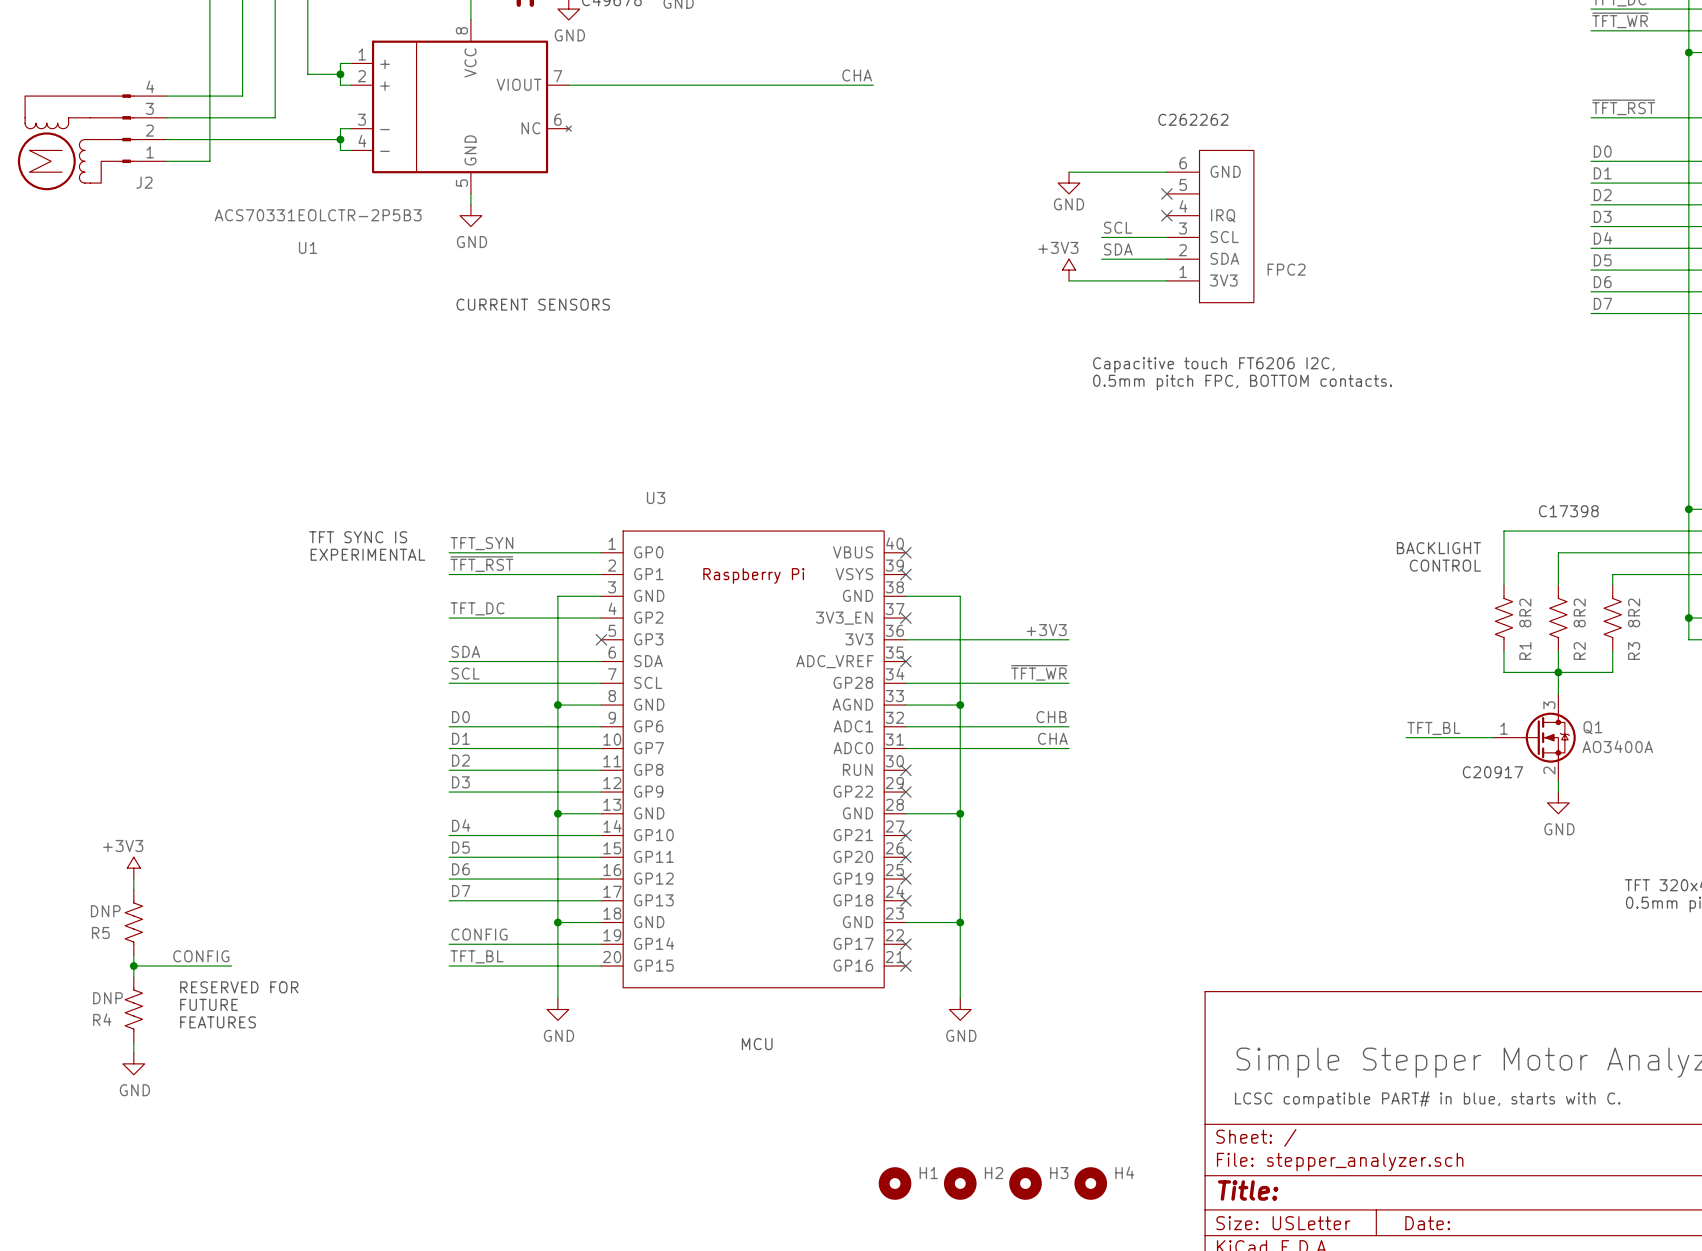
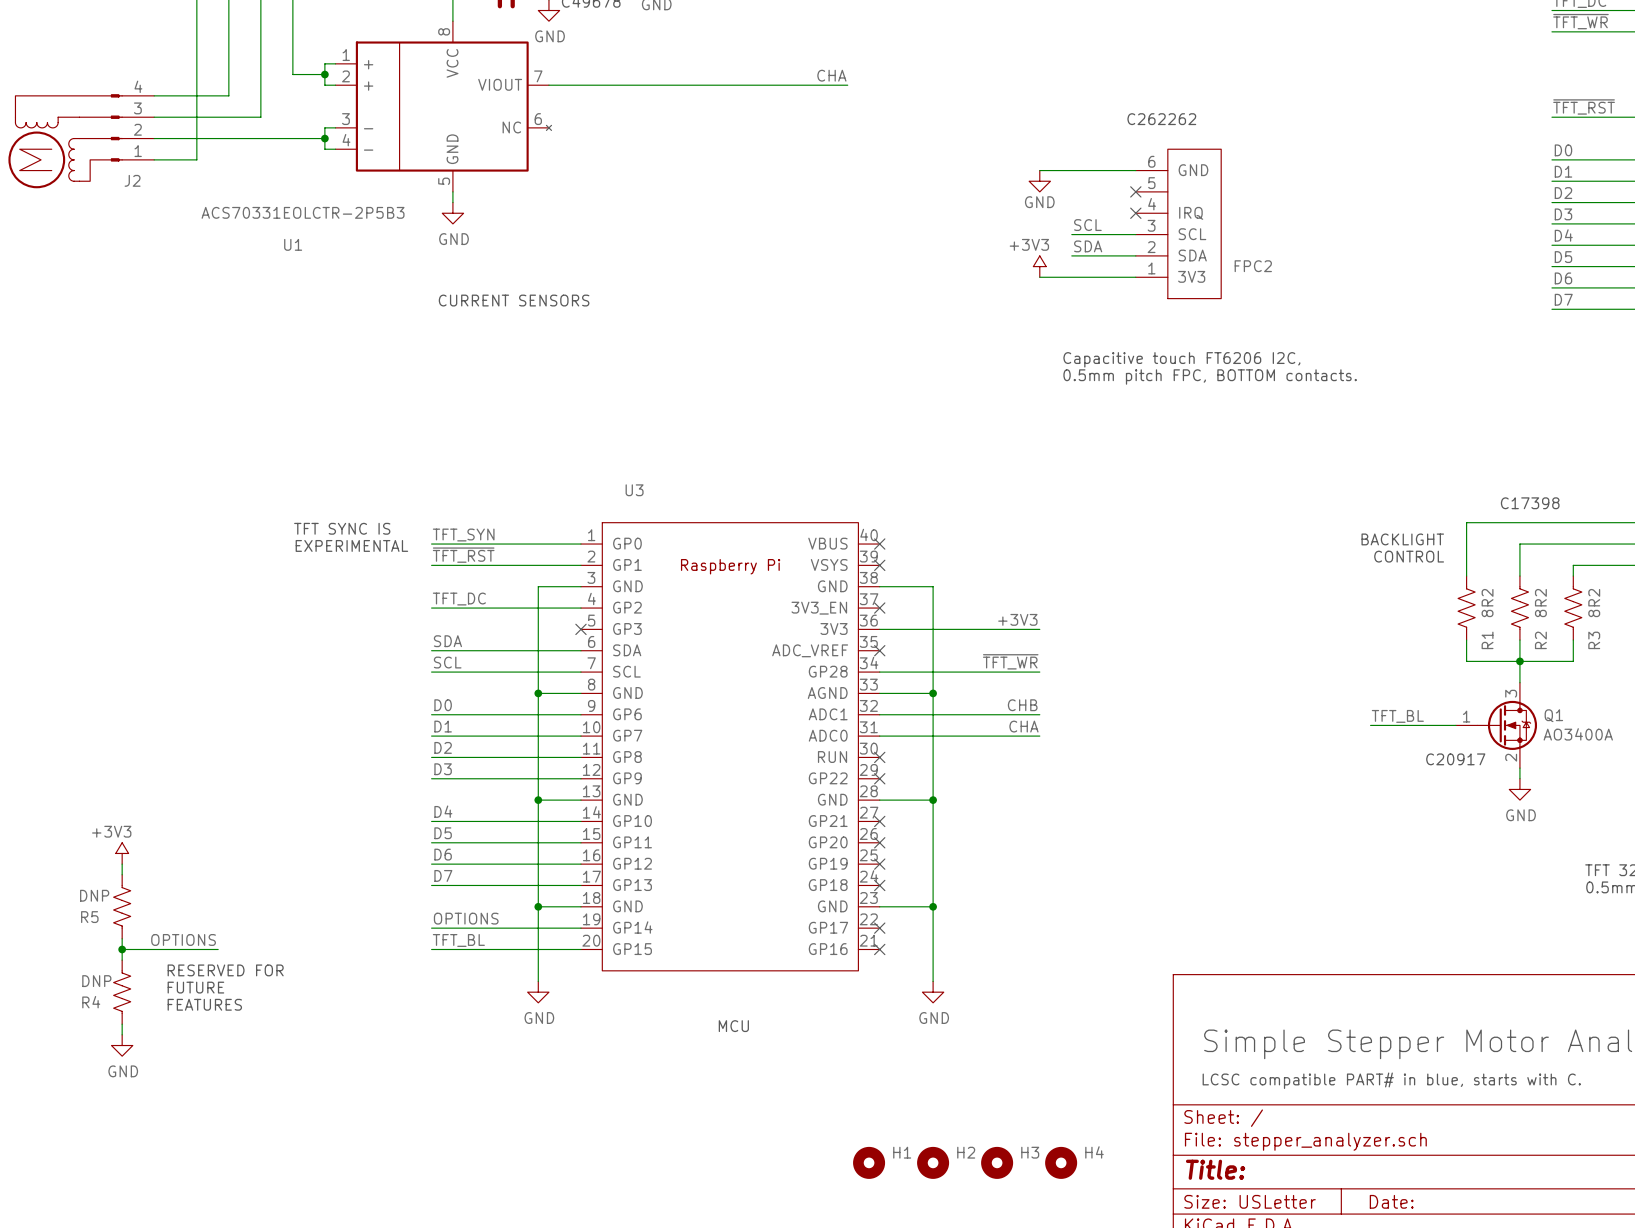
label: CONFIG (479, 934) -> OPTIONS (466, 918)
label: CONFIG (201, 956) -> OPTIONS (183, 939)

